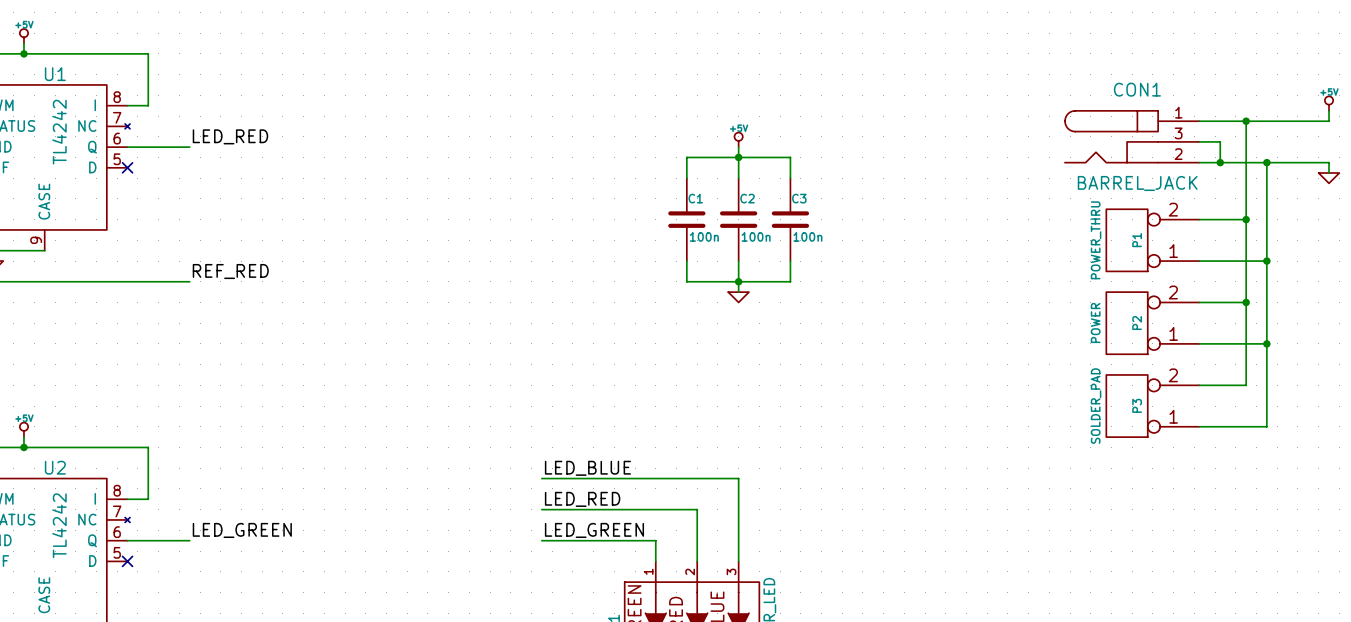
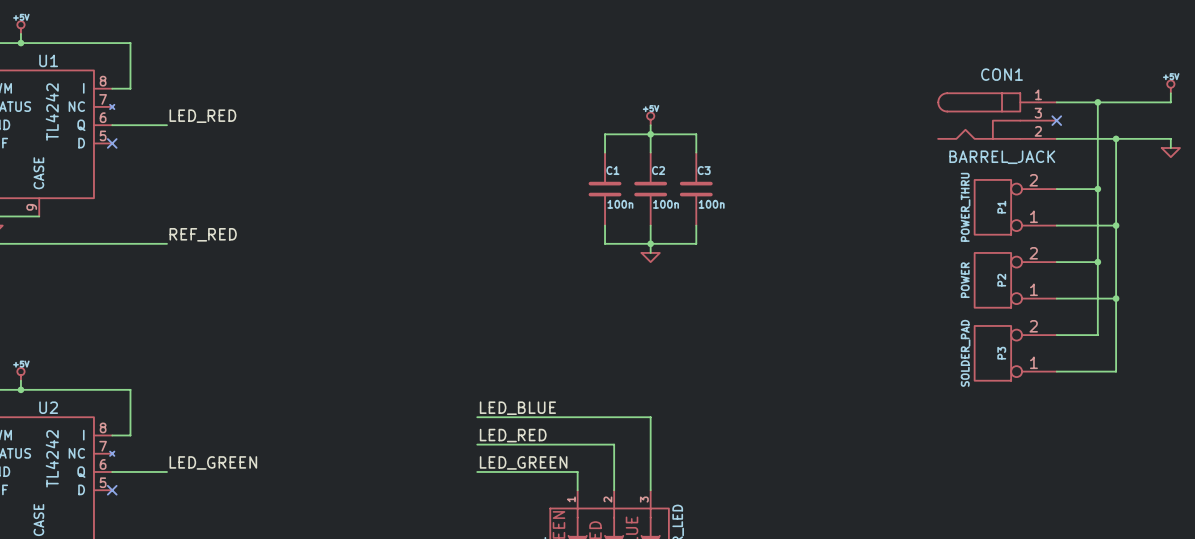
wire: (1199, 141) (1220, 141) (1220, 162) -> none
no-connect mark: none -> (1056, 120)
junction: (1220, 162) -> none

